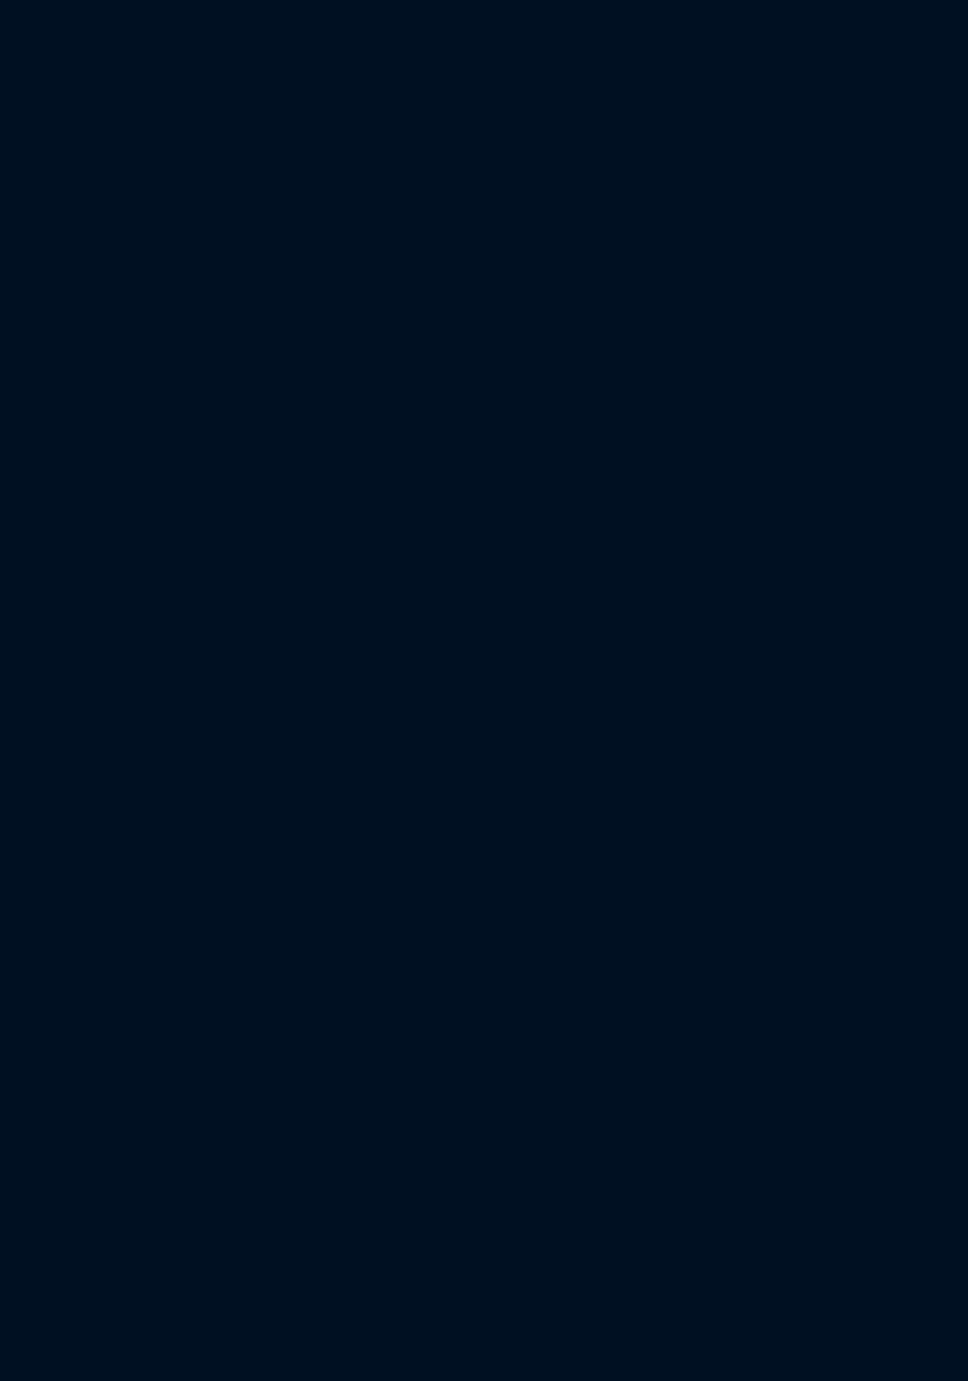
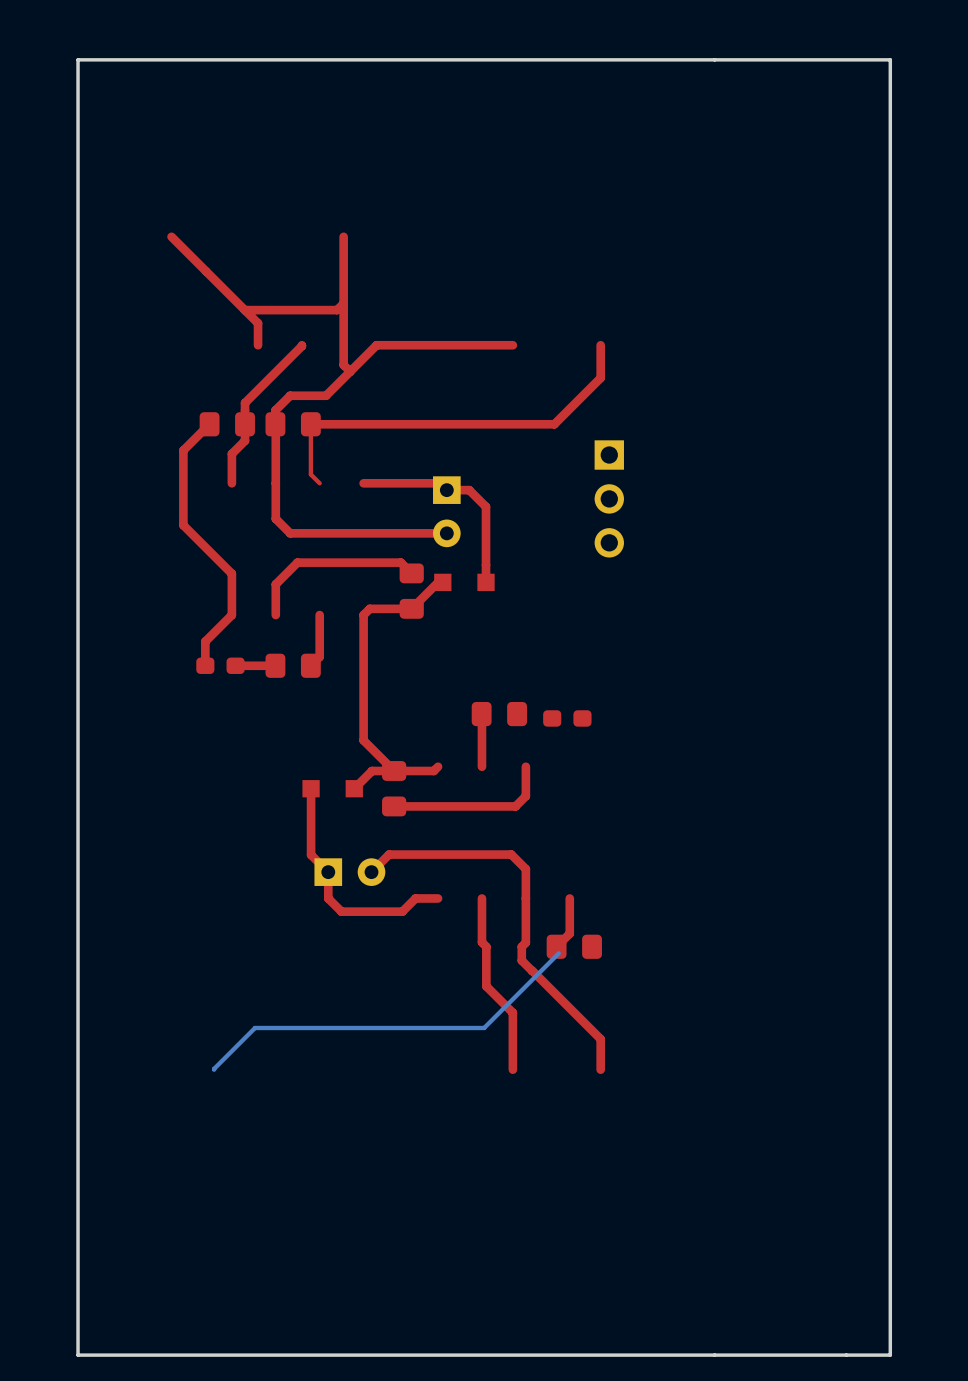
board edge: none -> (890, 59) (78, 59) (78, 1355) (890, 1355) (890, 59)
top track: none -> (171, 236) (258, 323) (258, 345)
top track: none -> (343, 236) (343, 365) (350, 371)
top track: none -> (343, 303) (337, 310) (244, 310)
top track: none -> (301, 345) (245, 402) (245, 440) (231, 453) (231, 483)
top track: none -> (512, 345) (376, 345) (326, 395) (290, 395) (275, 410) (275, 518) (290, 533) (446, 533)
top track: none -> (600, 345) (600, 378) (554, 424) (310, 424) (310, 474) (319, 483)
top track: none -> (209, 424) (183, 450) (183, 525) (231, 573) (231, 615) (205, 641) (205, 665)
part: none -> (227, 424)
part: none -> (293, 424)
top track: none -> (363, 483) (440, 483) (446, 490) (469, 490) (486, 506) (486, 582)
part: none -> (609, 498)
part: none -> (446, 511)
top track: none -> (411, 573) (400, 562) (297, 562) (275, 584) (275, 615)
top track: none -> (442, 582) (438, 582) (411, 608) (369, 608) (363, 615) (363, 740) (394, 770)
part: none -> (464, 582)
part: none -> (411, 591)
top track: none -> (319, 615) (319, 656) (310, 665)
part: none -> (220, 665)
top track: none -> (275, 665) (235, 665)
part: none -> (293, 665)
top track: none -> (481, 714) (481, 766)
part: none -> (499, 714)
part: none -> (567, 718)
top track: none -> (438, 766) (433, 770) (372, 770) (354, 788)
top track: none -> (525, 766) (525, 796) (515, 806) (394, 806)
top track: none -> (311, 788) (311, 854) (328, 872) (328, 898) (341, 911) (402, 911) (415, 898) (438, 898)
part: none -> (332, 788)
part: none -> (394, 788)
part: none -> (349, 872)
top track: none -> (371, 872) (389, 854) (511, 854) (525, 869) (525, 942) (521, 946) (521, 960) (532, 971)
top track: none -> (481, 898) (481, 942) (486, 946) (486, 986) (512, 1012) (512, 1069)
top track: none -> (569, 898) (569, 933) (556, 946)
part: none -> (574, 946)
bottom track: none -> (558, 953) (484, 1028) (255, 1028) (214, 1069)
top track: none -> (532, 971) (600, 1039) (600, 1069)

